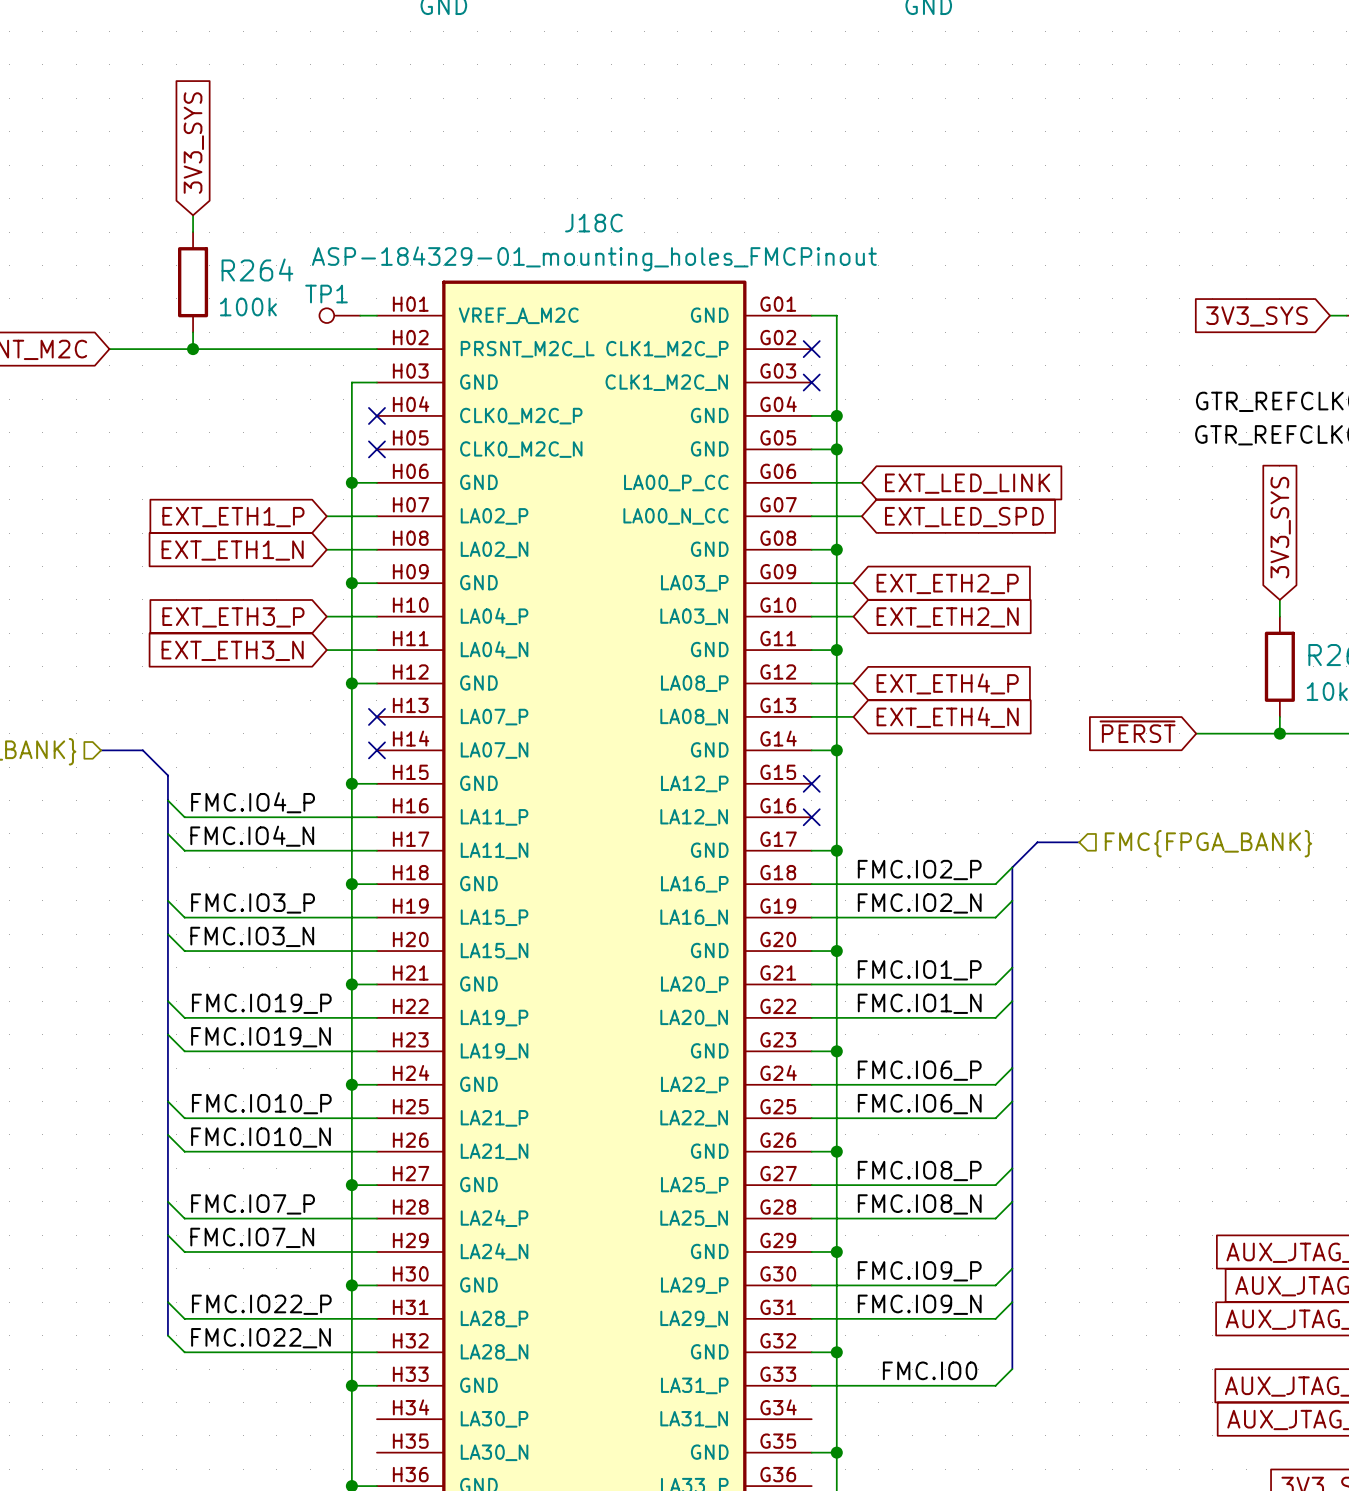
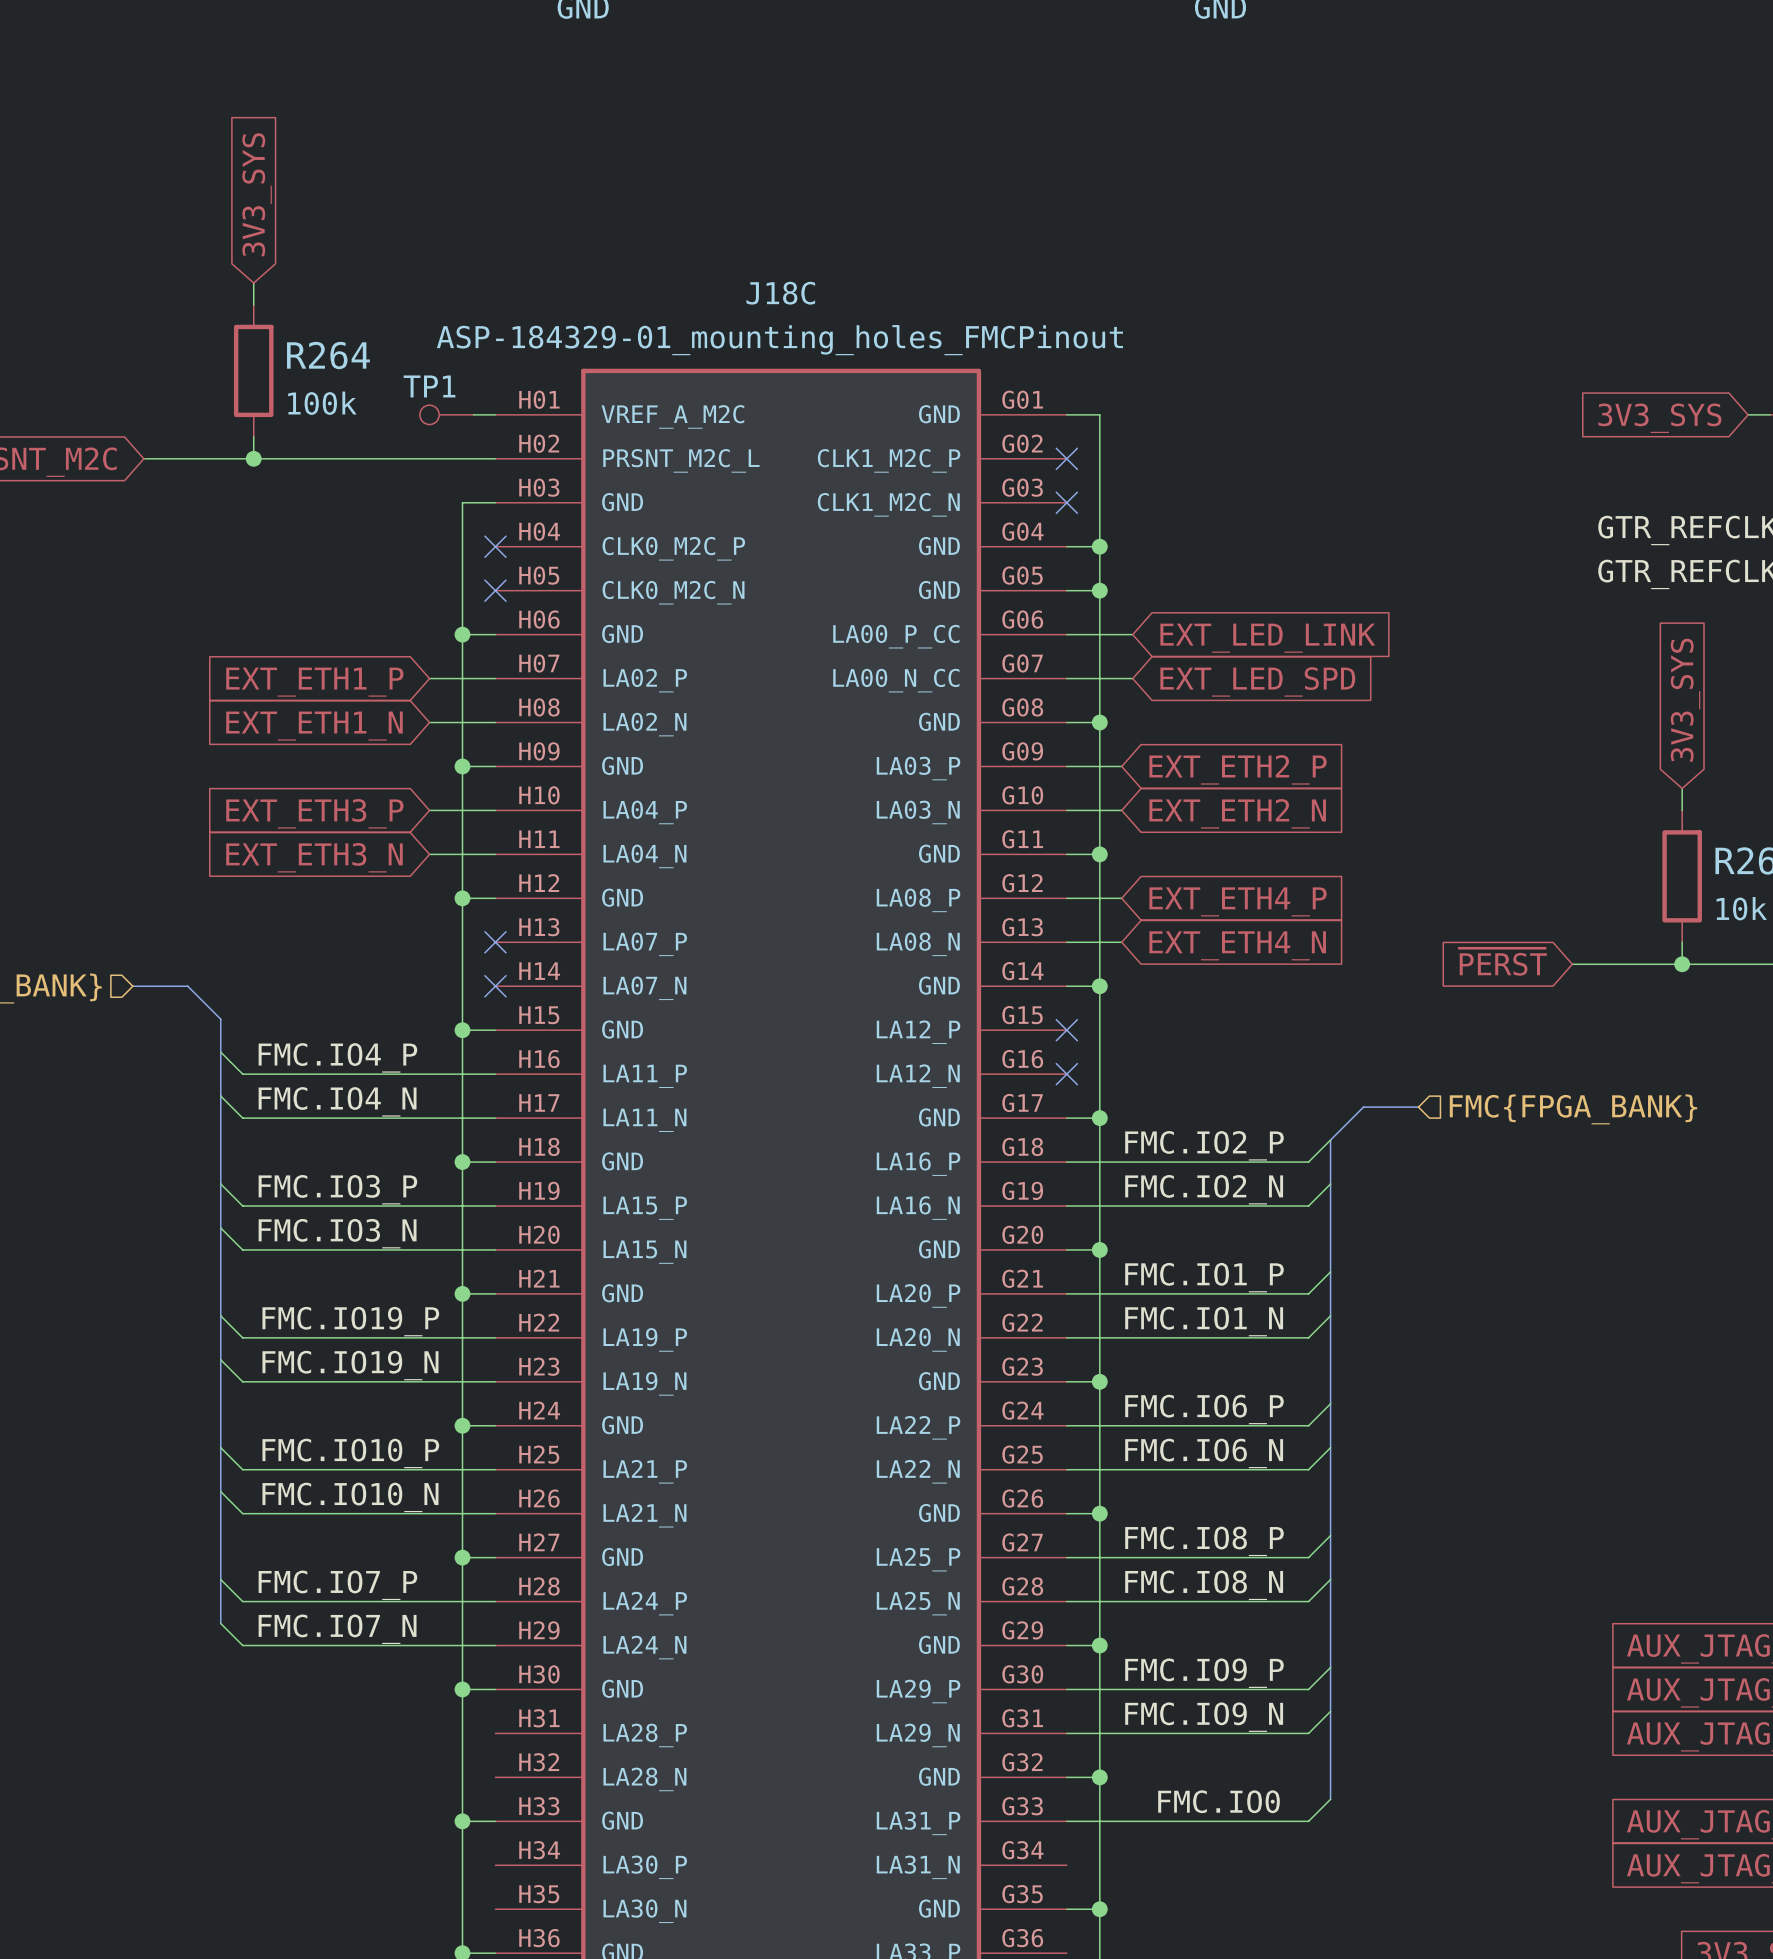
bus: (167, 1235) (167, 1335) -> none
wire: (167, 1302) (184, 1318) (376, 1318) -> none
label: FMC.IO22_P (261, 1304) -> none
wire: (167, 1335) (184, 1352) (376, 1352) -> none
label: FMC.IO22_N (261, 1338) -> none

